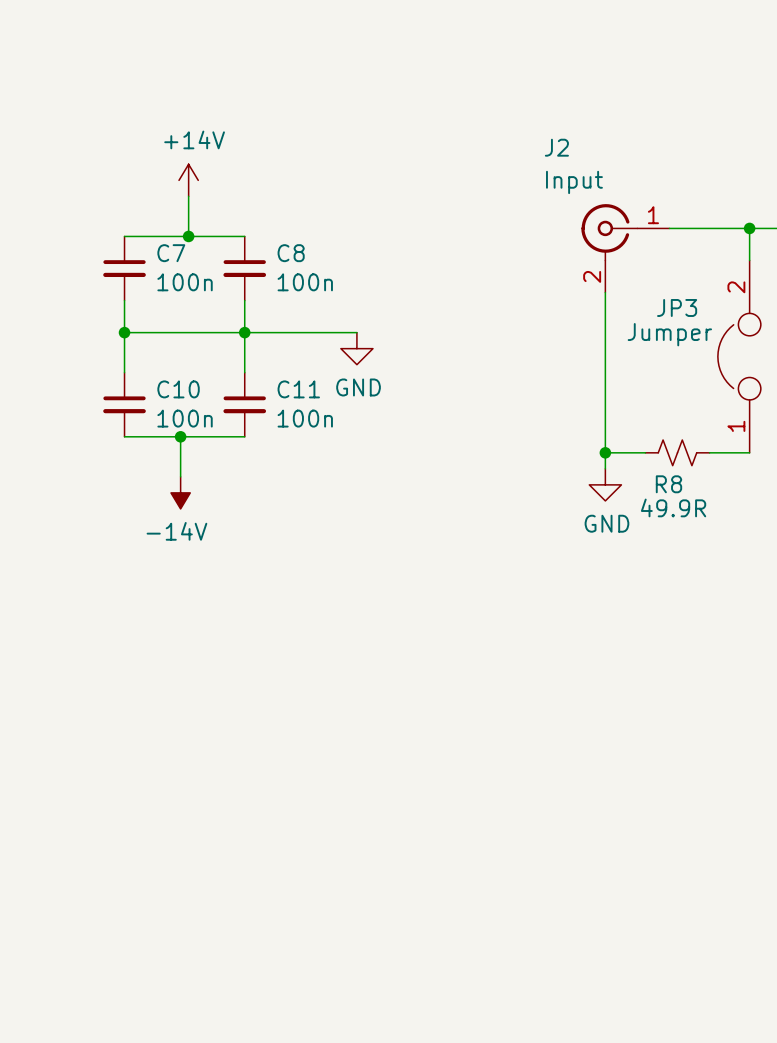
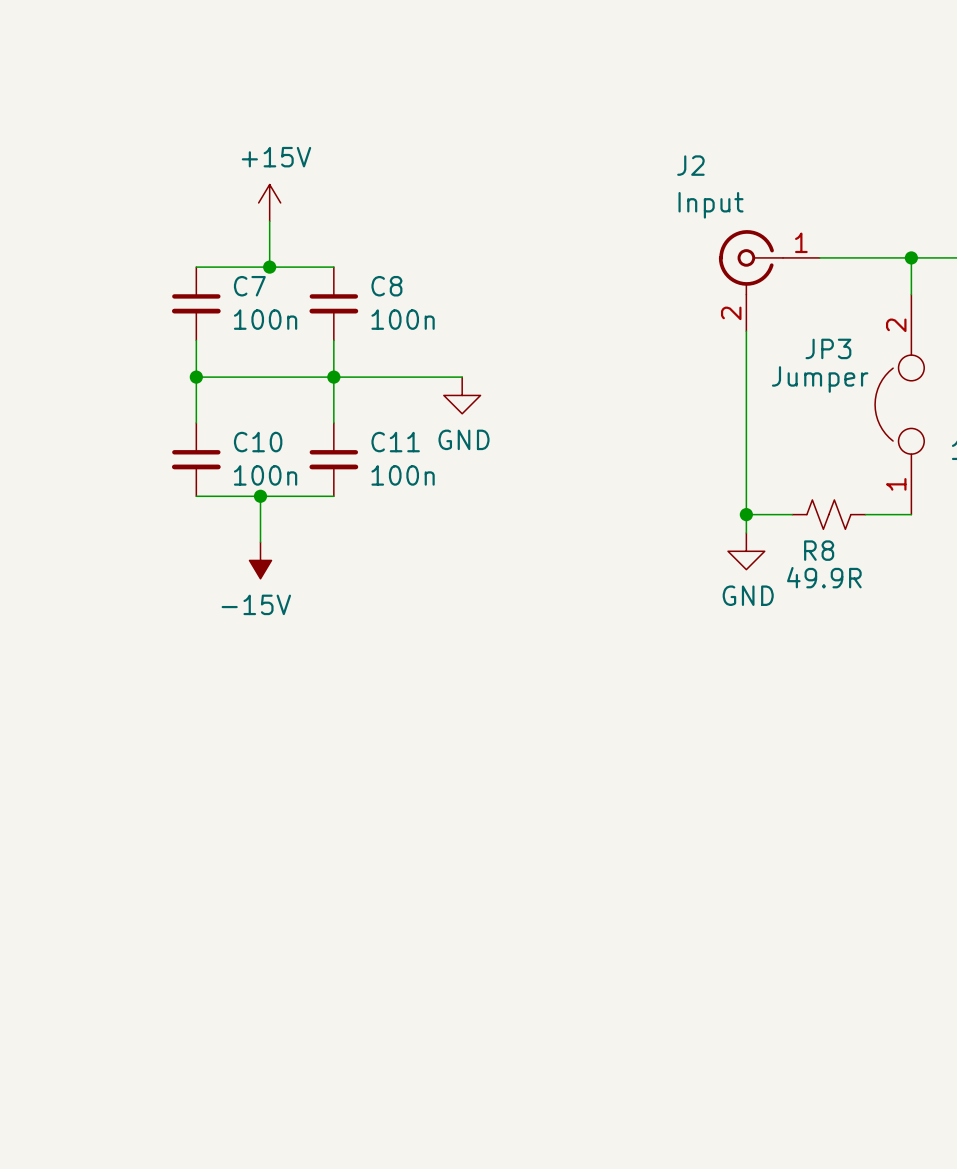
power symbol: +14V (188, 180) -> +15V (269, 202)
power symbol: -14V (180, 492) -> -15V (260, 560)

